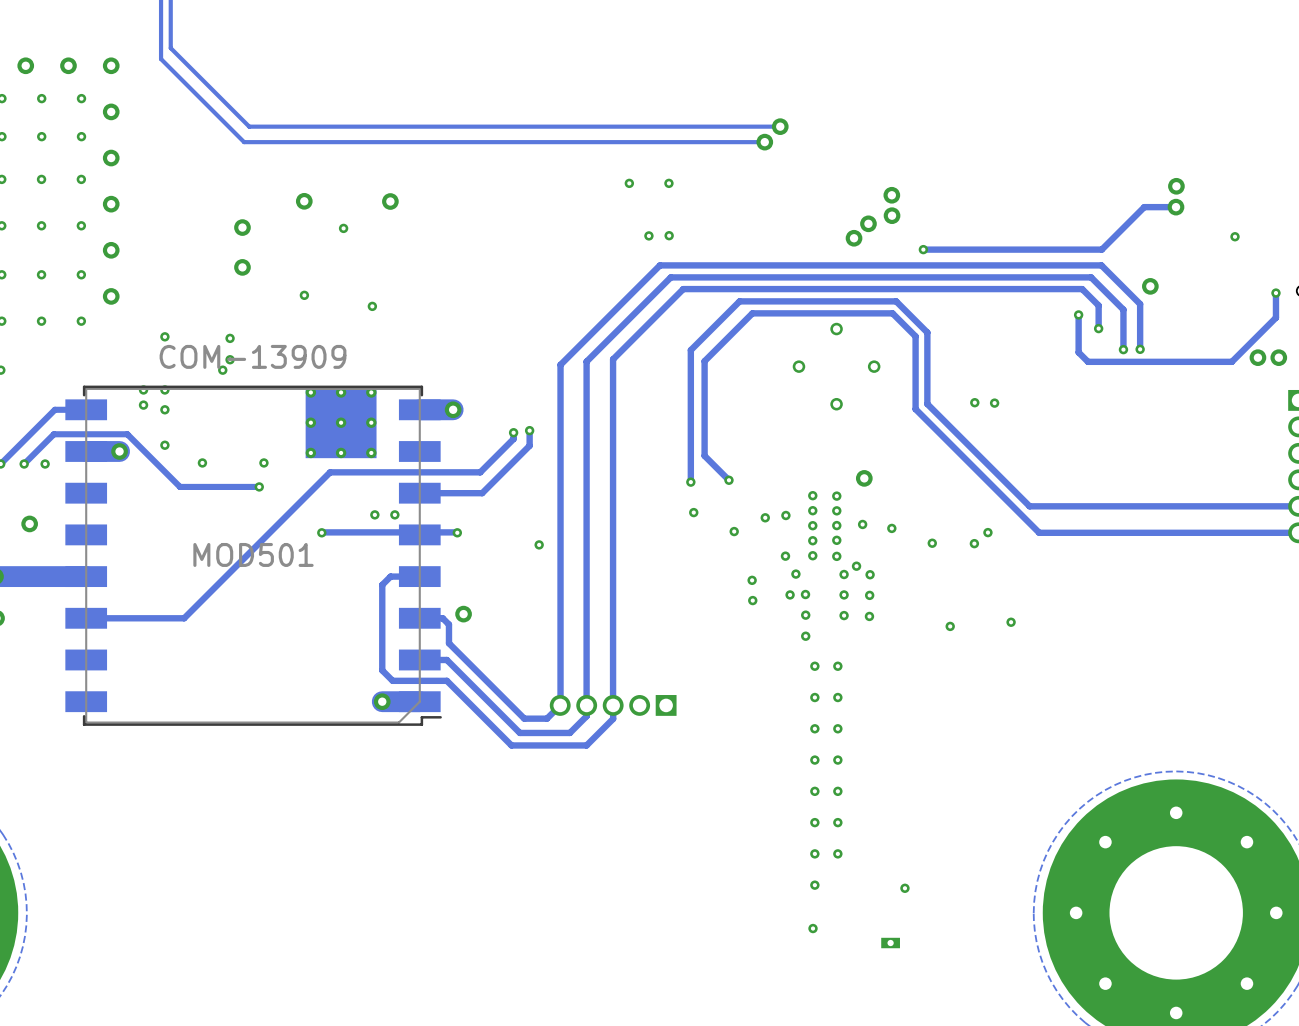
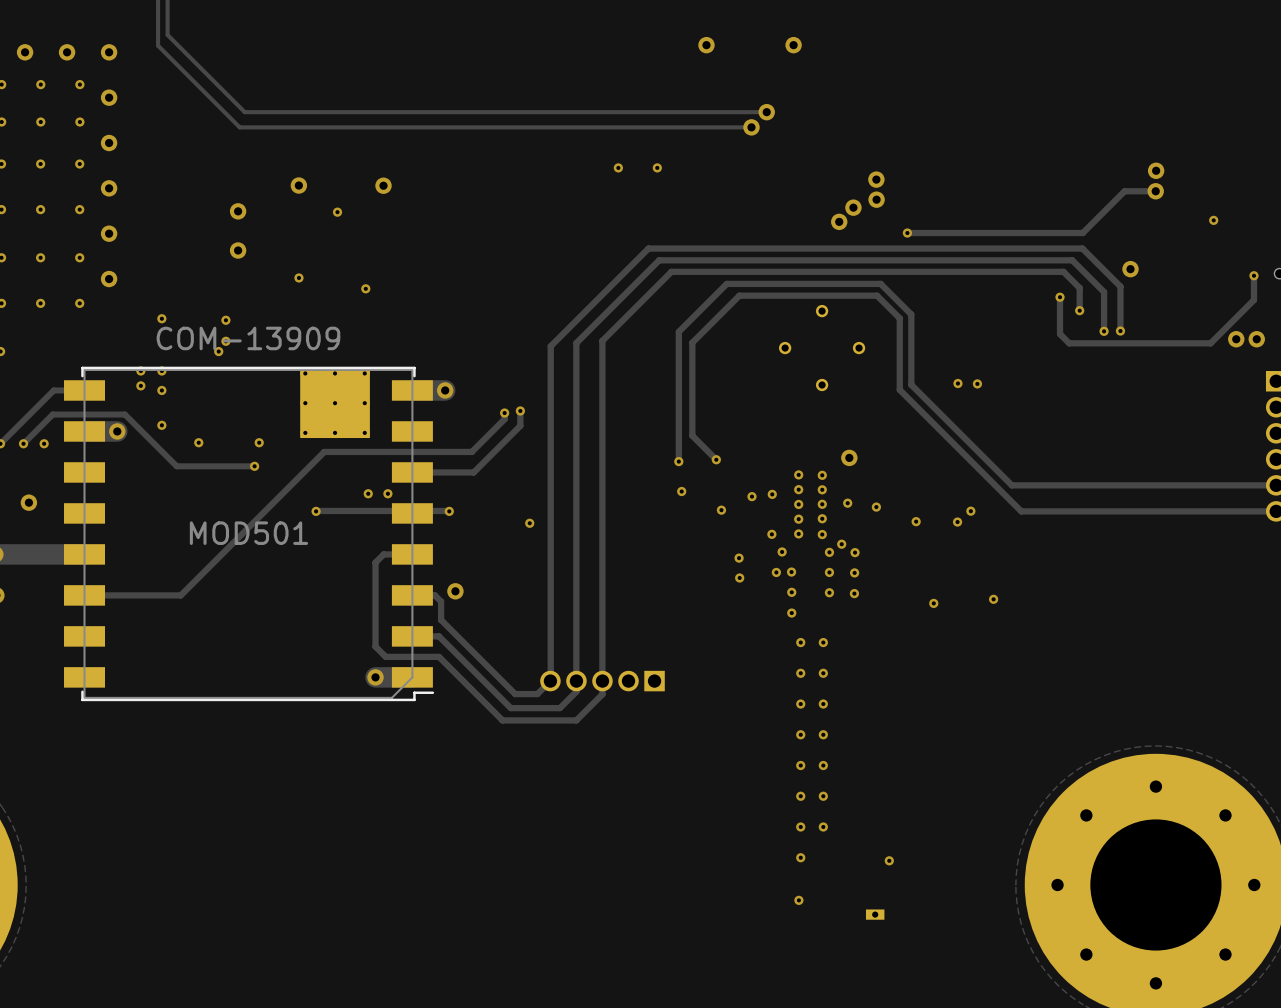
via: none -> (706, 45)
via: none -> (793, 45)
via: (648, 235) -> none
via: (669, 235) -> none

